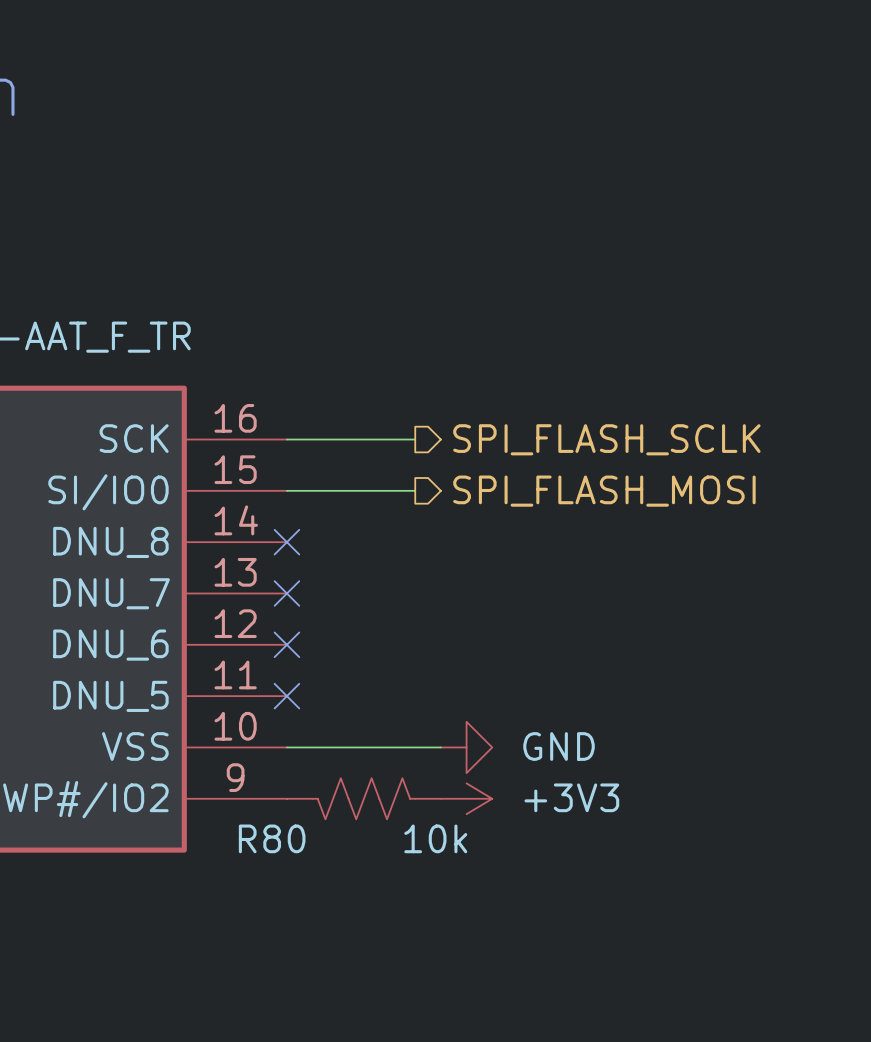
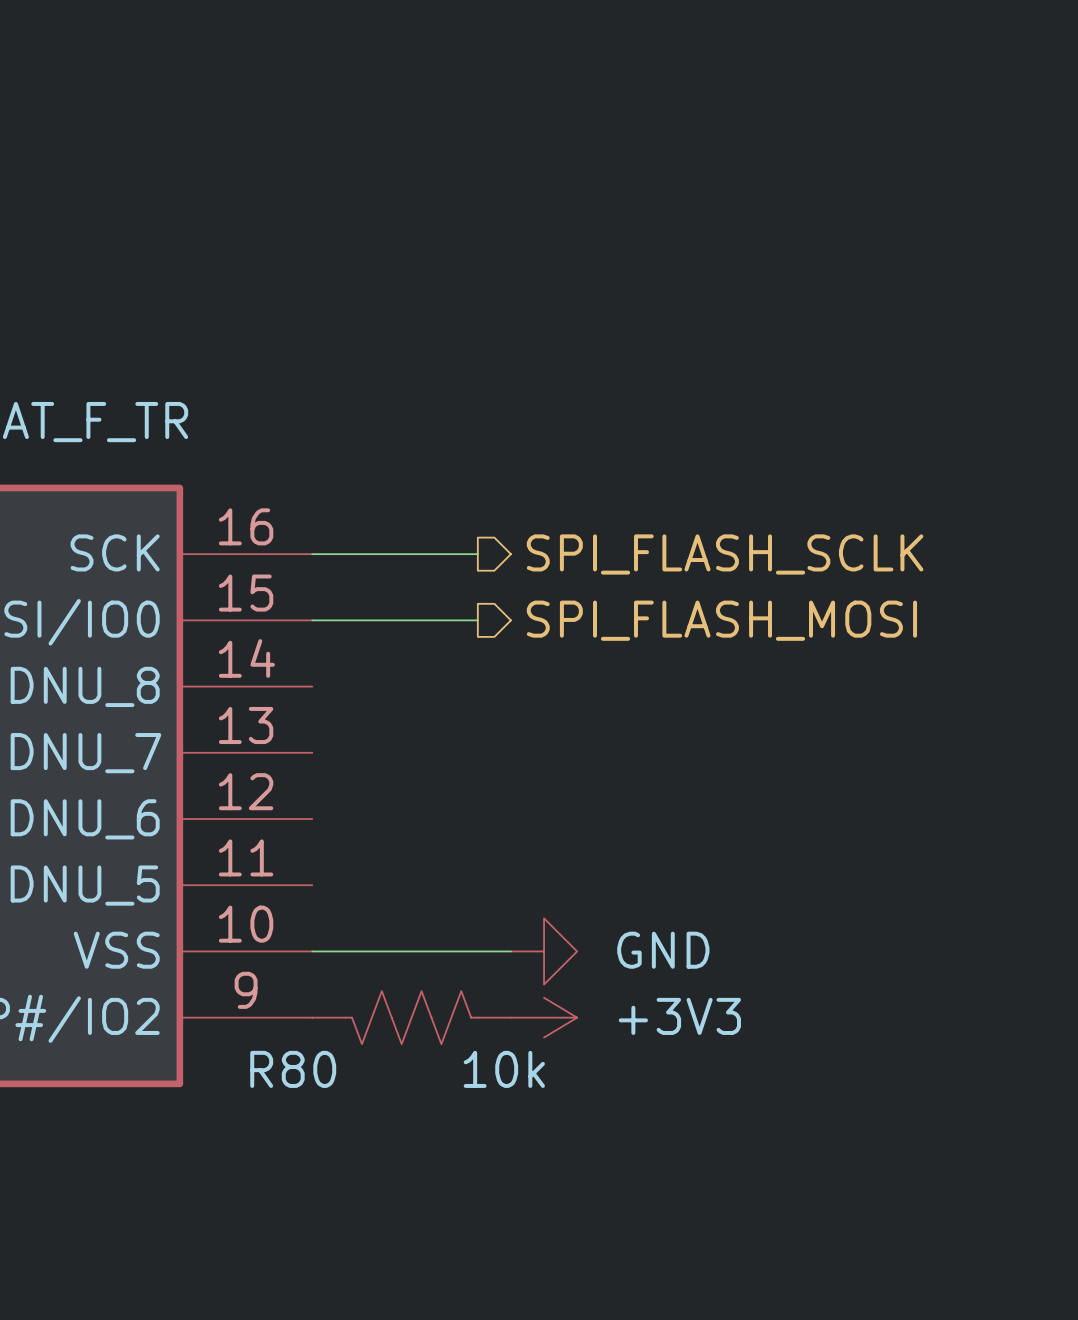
no-connect mark: (286, 542) -> none
no-connect mark: (286, 593) -> none
no-connect mark: (286, 644) -> none
no-connect mark: (286, 696) -> none

